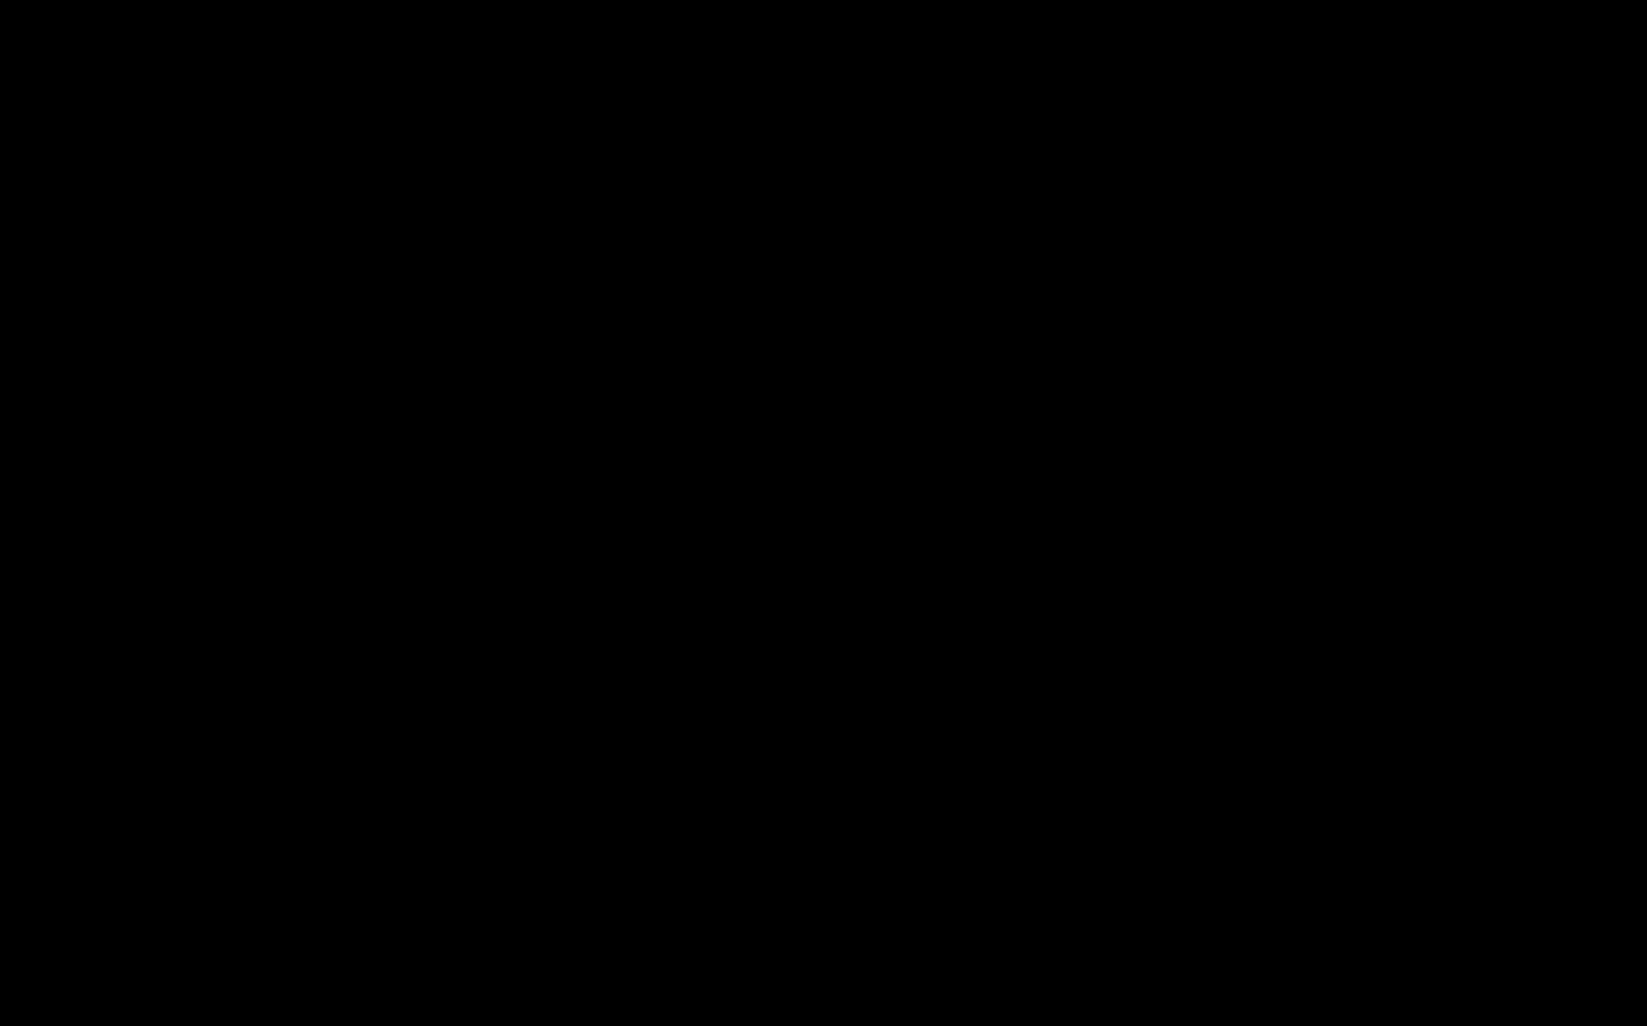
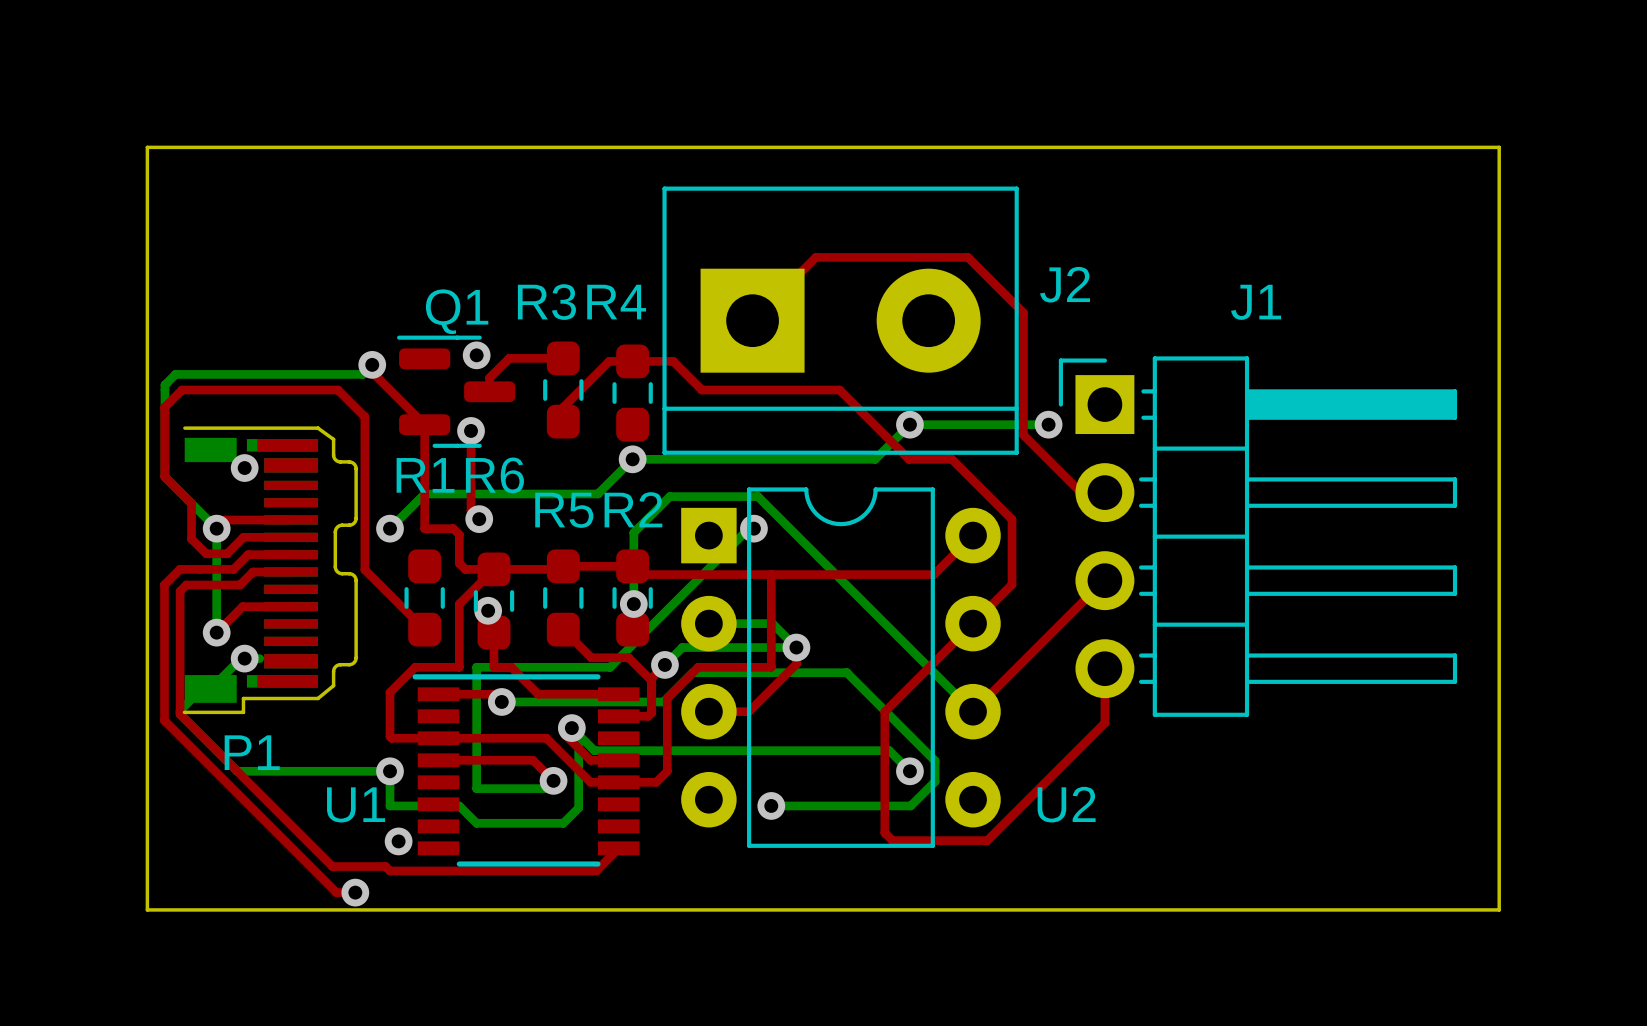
board edge: none -> (147, 147) (1499, 147) (1499, 909) (147, 909) (147, 147)
top track: none -> (752, 320) (815, 257) (968, 257) (1023, 312) (1023, 435) (1080, 492) (1104, 492)
J2: none -> (840, 320)
via: none -> (476, 355)
top track: none -> (563, 358) (509, 358) (489, 377) (489, 391)
top track: none -> (372, 364) (372, 372) (424, 424)
bottom track: none -> (372, 364) (362, 374) (175, 374) (164, 385) (164, 476) (216, 528) (216, 632)
via: none -> (372, 364)
R3: none -> (563, 390)
Q1: none -> (456, 391)
R4: none -> (632, 393)
top track: none -> (563, 421) (563, 407) (609, 361) (673, 361) (701, 390) (839, 390) (909, 459) (951, 459) (1012, 519) (1012, 584) (884, 711) (884, 832) (892, 840) (987, 840) (1104, 722) (1104, 668)
top track: none -> (424, 424) (424, 528) (453, 528) (459, 534) (459, 563) (465, 569) (560, 569) (563, 566) (632, 566) (640, 574) (934, 574) (973, 535)
via: none -> (909, 424)
bottom track: none -> (1048, 424) (909, 424) (875, 459) (632, 459) (597, 493) (424, 493) (390, 528)
via: none -> (1048, 424)
top track: none -> (471, 430) (471, 510) (479, 519)
via: none -> (471, 430)
via: none -> (632, 459)
via: none -> (244, 468)
top track: none -> (291, 519) (225, 519) (216, 528)
via: none -> (479, 519)
via: none -> (216, 528)
via: none -> (390, 528)
bottom track: none -> (748, 528) (610, 667) (476, 667) (476, 788) (545, 788) (553, 780)
via: none -> (753, 528)
J1: none -> (1257, 536)
top track: none -> (291, 537) (243, 537) (227, 553) (206, 553) (191, 539) (191, 503) (164, 476) (164, 407) (182, 390) (338, 390) (364, 416) (364, 569) (424, 629)
top track: none -> (291, 554) (248, 554) (233, 569) (179, 569) (164, 584) (164, 720) (336, 892) (355, 892)
top track: none -> (493, 569) (459, 604) (459, 667) (415, 667) (390, 692) (390, 736) (391, 738) (546, 738) (590, 782) (656, 782) (667, 771) (667, 698) (698, 667) (771, 667) (771, 574)
P1: none -> (270, 570)
top track: none -> (291, 571) (253, 571) (240, 584) (186, 584) (180, 591) (180, 714) (332, 866) (385, 866) (390, 870) (596, 870) (618, 848)
top track: none -> (1104, 580) (973, 711)
R1: none -> (424, 597)
R5: none -> (563, 597)
R2: none -> (632, 597)
R6: none -> (493, 601)
bottom track: none -> (633, 604) (633, 532) (669, 496) (757, 496) (973, 711)
via: none -> (633, 604)
top track: none -> (291, 606) (242, 606) (216, 632)
top track: none -> (488, 610) (493, 616) (493, 667) (511, 667) (538, 694) (618, 694)
via: none -> (488, 610)
bottom track: none -> (708, 623) (772, 623) (796, 647) (682, 647) (664, 664)
top track: none -> (563, 629) (591, 657) (628, 657) (651, 680)
via: none -> (216, 632)
top track: none -> (796, 647) (796, 664) (748, 711) (708, 711)
via: none -> (796, 647)
via: none -> (244, 658)
bottom track: none -> (259, 658) (241, 658) (210, 688) (201, 688) (180, 710) (180, 714) (237, 771) (390, 771) (390, 805) (459, 805) (476, 823) (563, 823) (578, 807) (577, 733)
top track: none -> (664, 664) (651, 678) (651, 712) (648, 716) (618, 716)
via: none -> (664, 664)
U2: none -> (840, 667)
top track: none -> (438, 694) (494, 694) (501, 701)
bottom track: none -> (501, 701) (663, 701) (692, 672) (846, 672) (935, 760) (935, 781) (910, 805) (771, 805)
via: none -> (501, 701)
top track: none -> (571, 728) (565, 734) (590, 760) (618, 760)
bottom track: none -> (571, 728) (594, 750) (889, 750) (909, 771)
via: none -> (571, 728)
top track: none -> (438, 760) (532, 760) (553, 780)
U1: none -> (526, 770)
via: none -> (390, 771)
via: none -> (909, 771)
via: none -> (553, 780)
via: none -> (771, 805)
via: none -> (398, 841)
via: none -> (355, 892)

